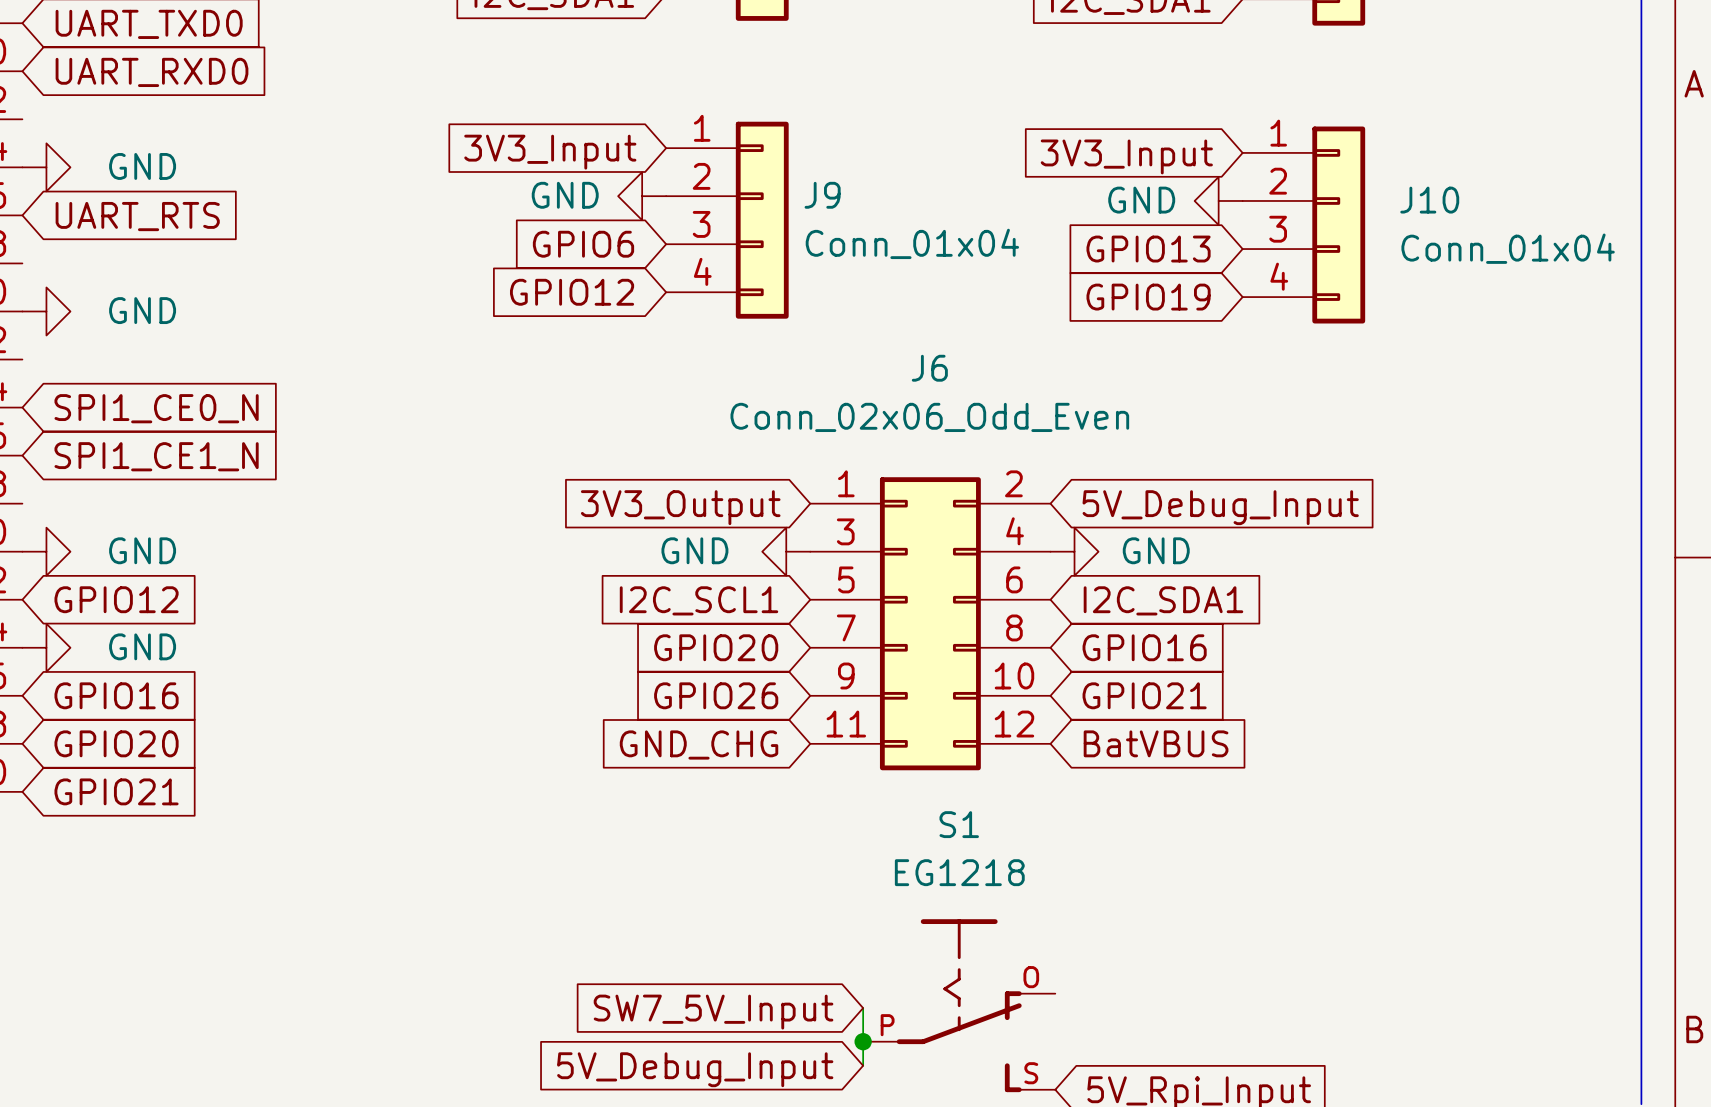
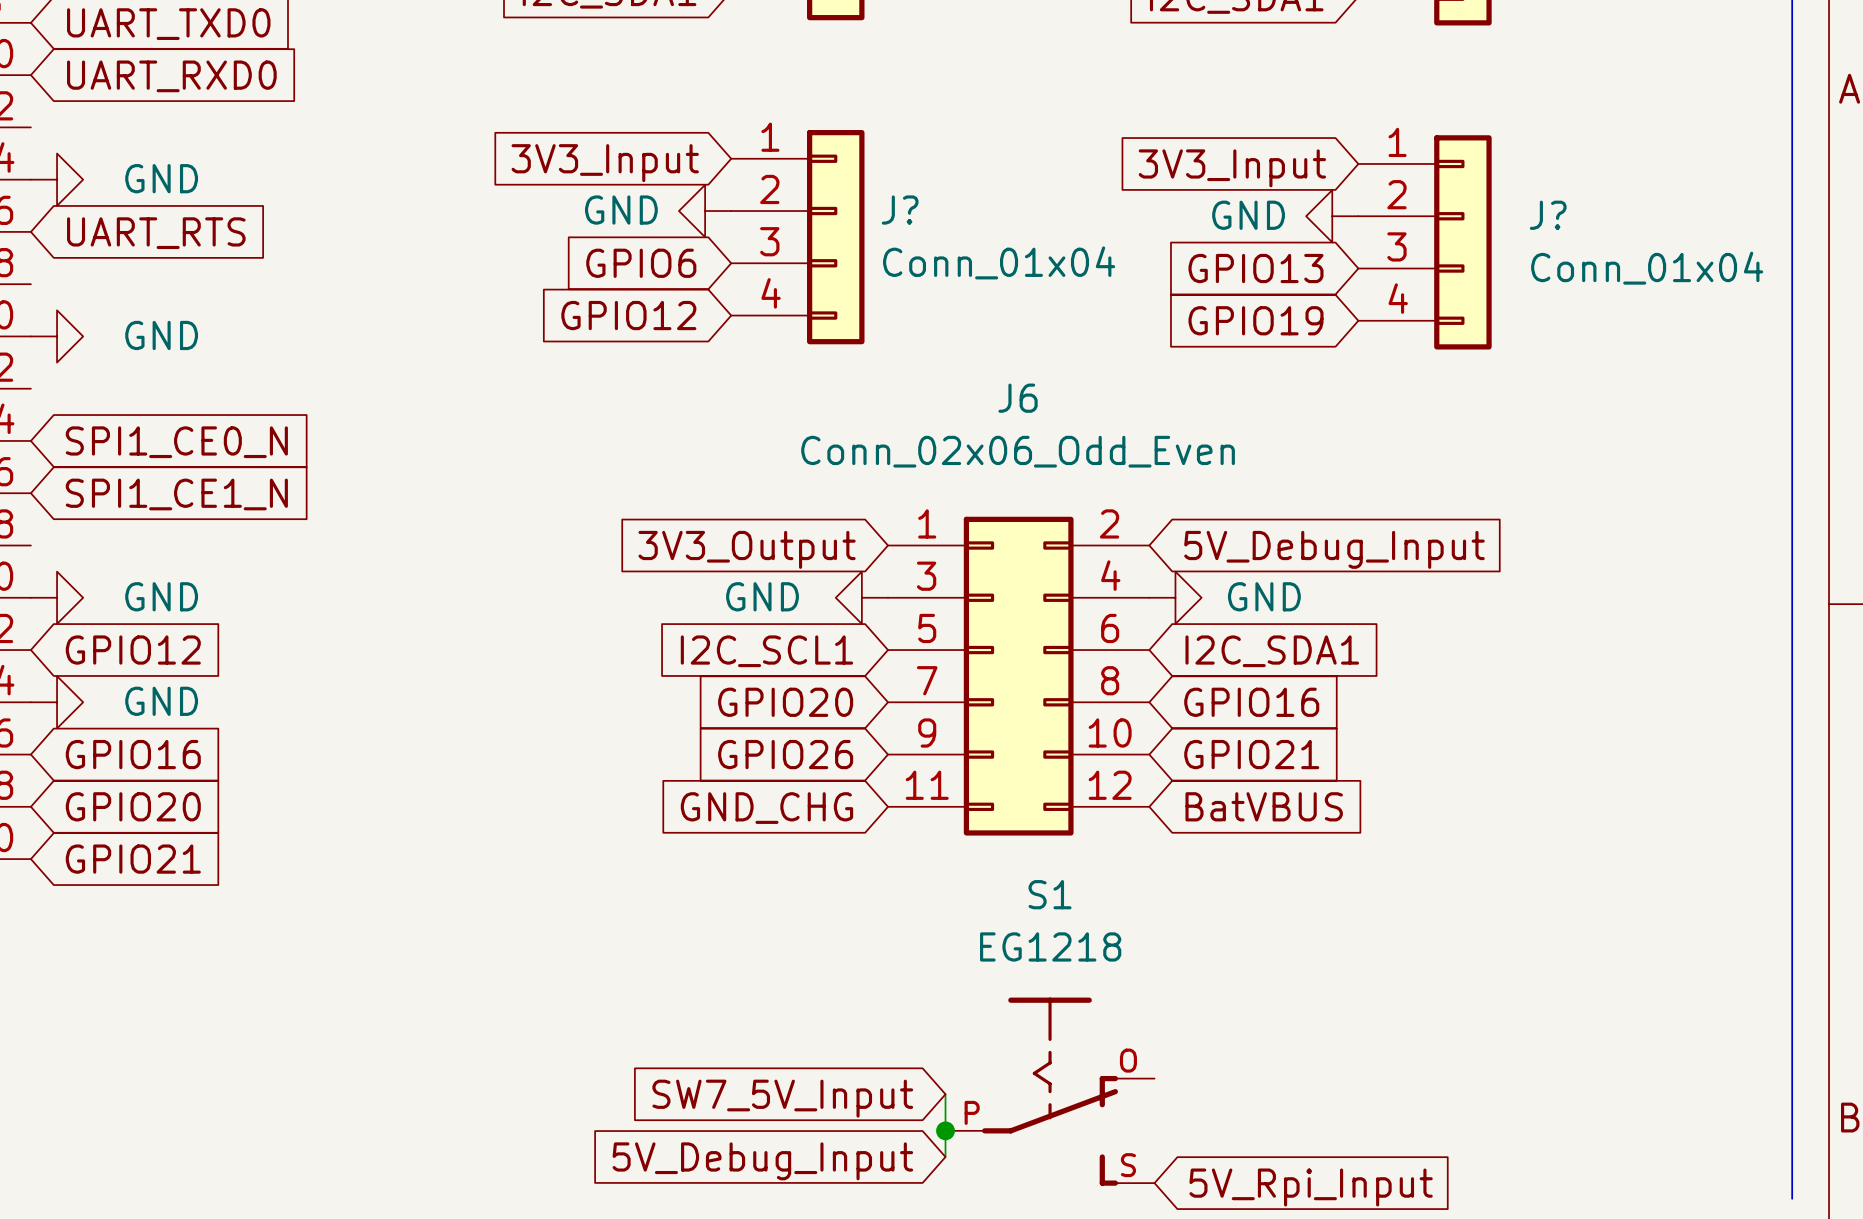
J9 name: J9 (822, 195) -> J? (900, 210)
J10 name: J10 (1429, 200) -> J? (1548, 215)

